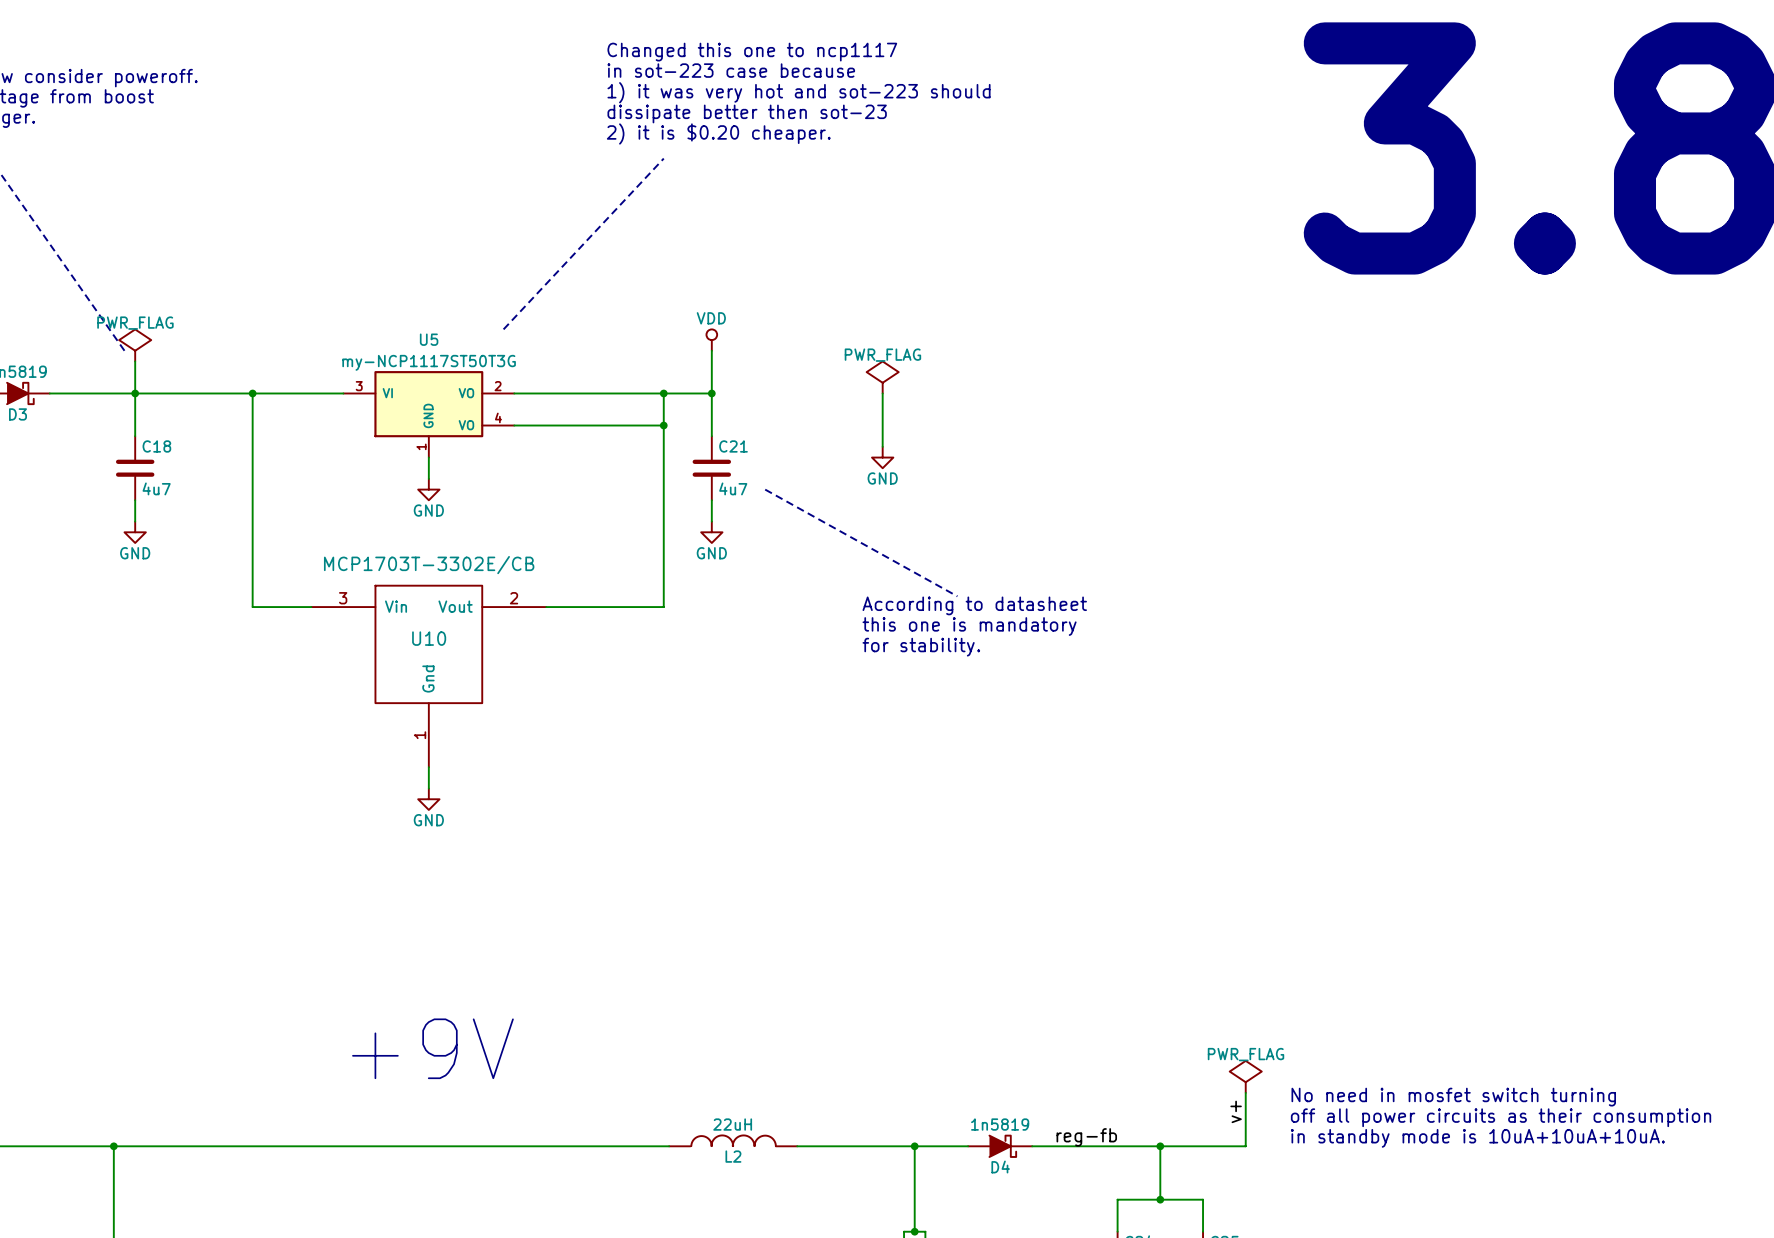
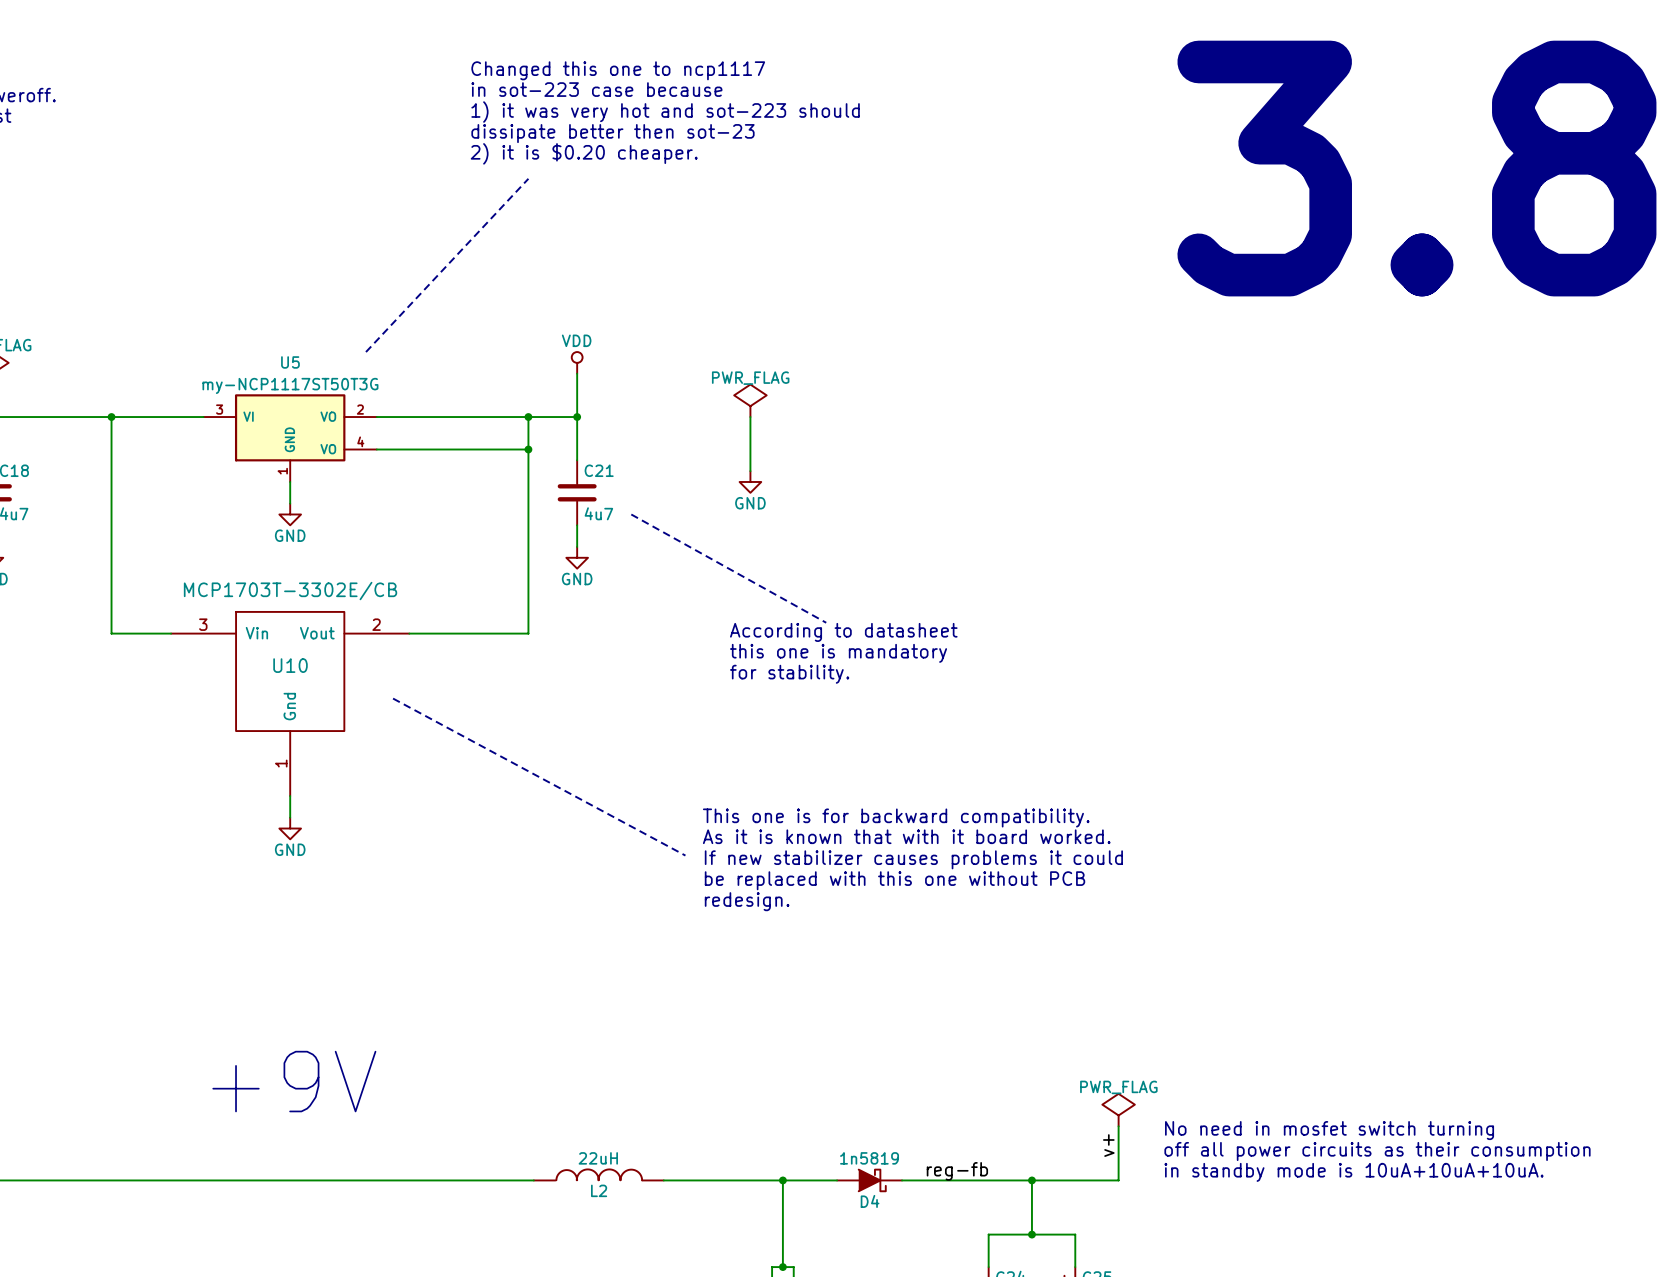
line: none -> (393, 698) (685, 855)
text: none -> This one is for backward compatibility. (896, 817)
text: none -> As it is known that with it board worked. (906, 836)
text: none -> If new stabilizer causes problems it could (913, 859)
text: none -> be replaced with this one without PCB (894, 880)
text: none -> redesign. (747, 901)

